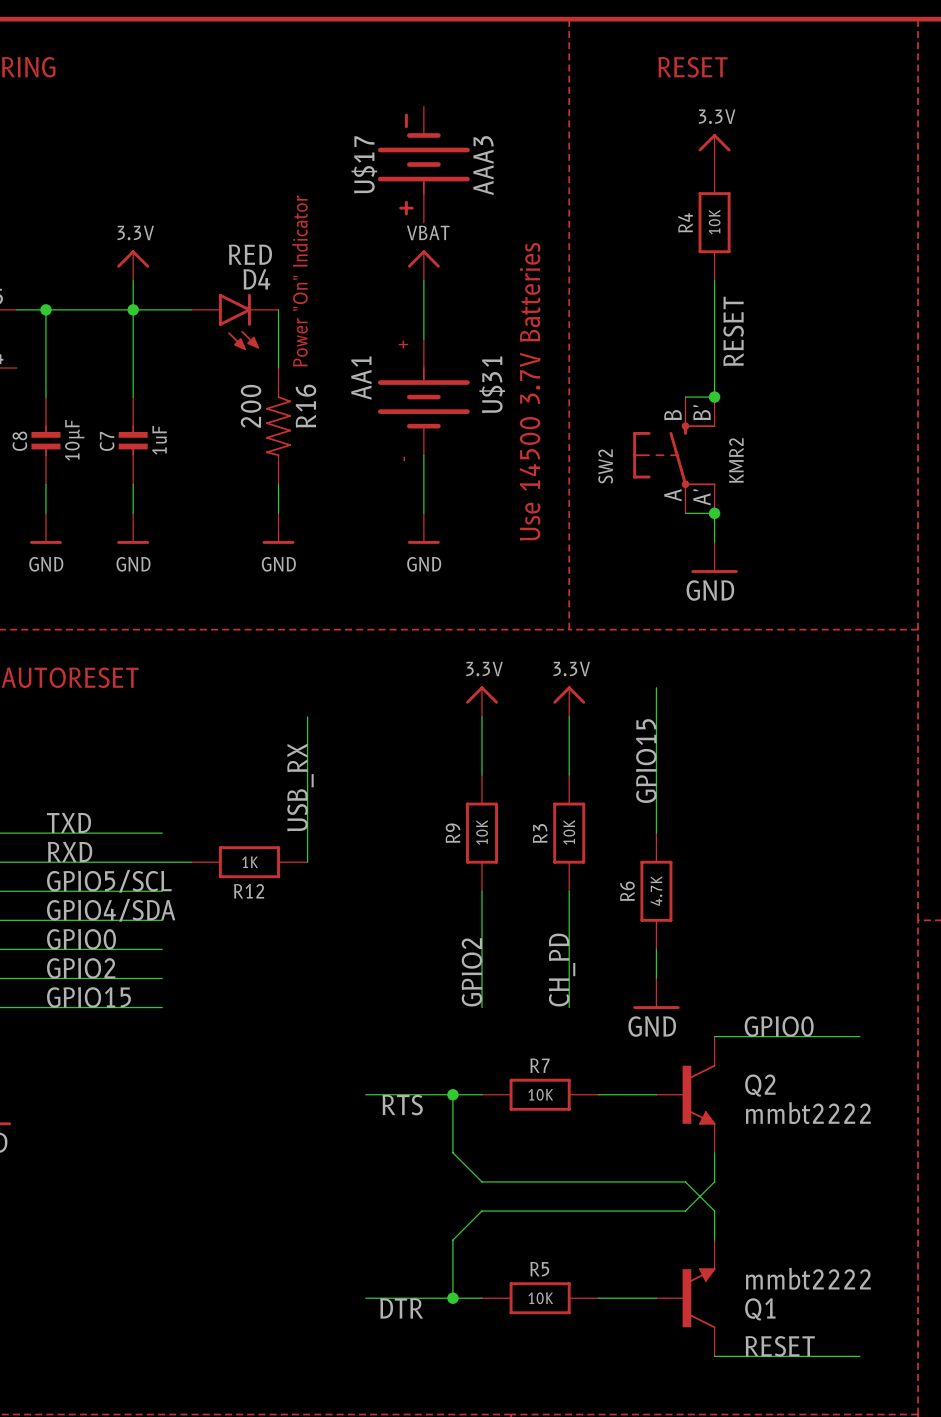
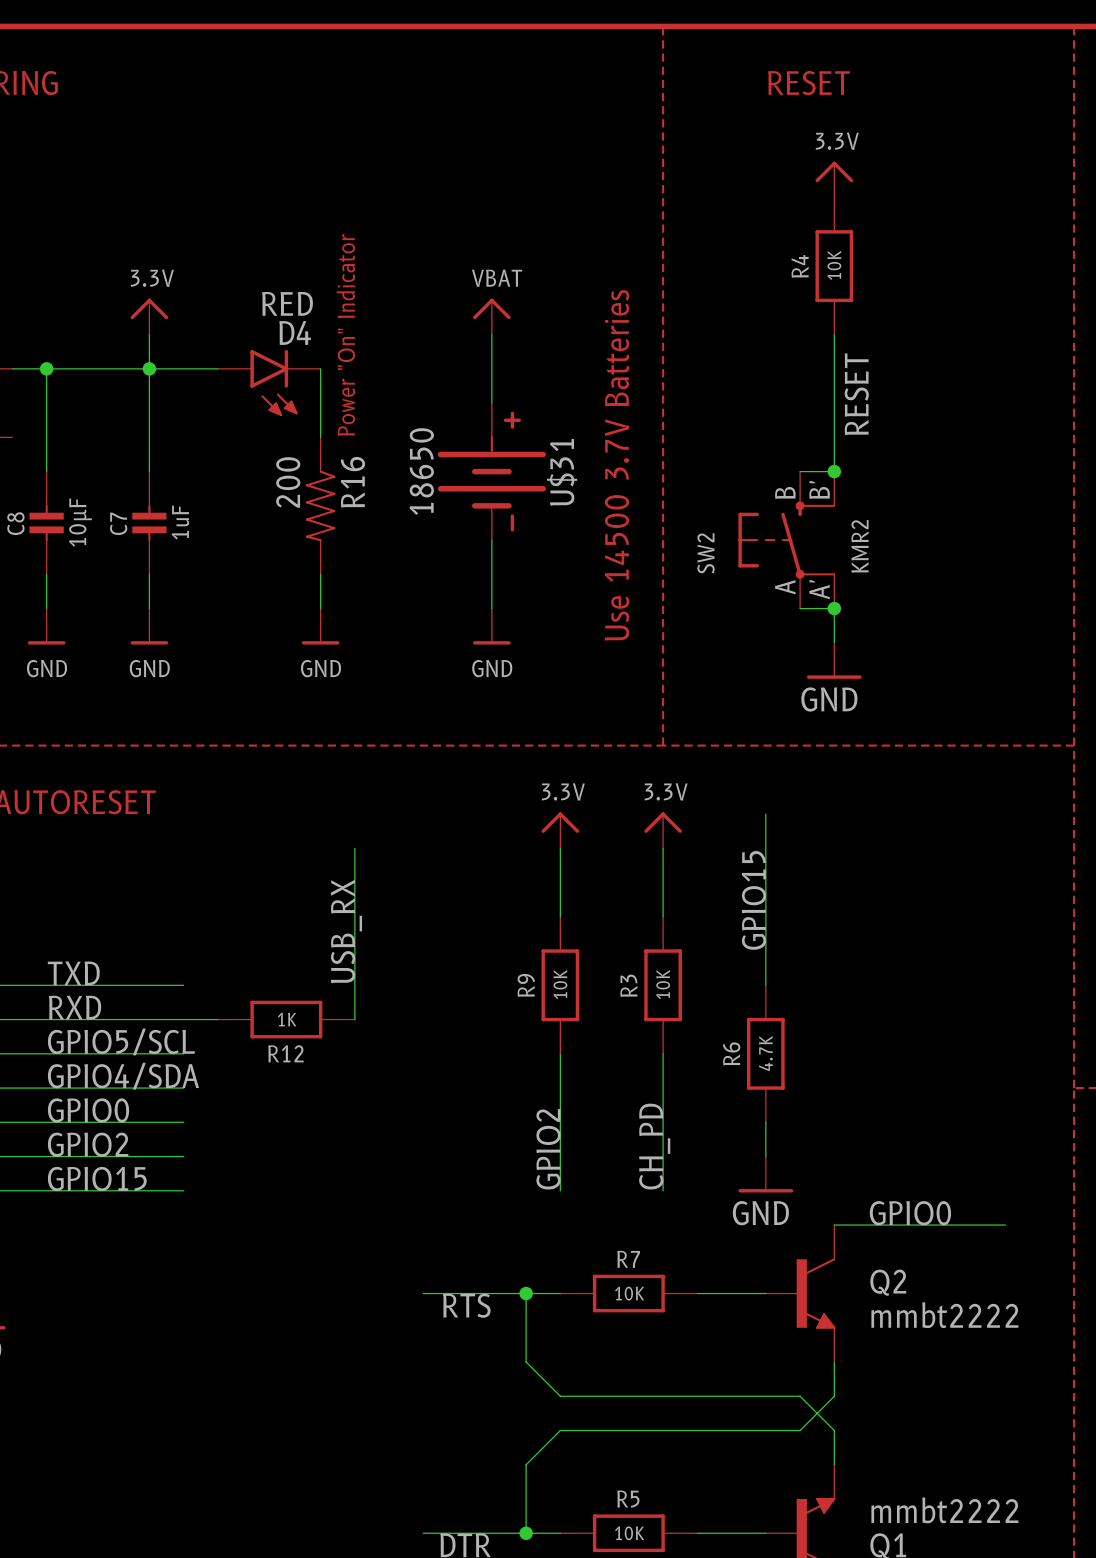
U$17: AAA3 (423, 164) -> none
U$31 symbol: [377, 338, 470, 456] -> [437, 403, 546, 541]
U$31 value: AA1 (361, 378) -> 18650 (421, 471)

